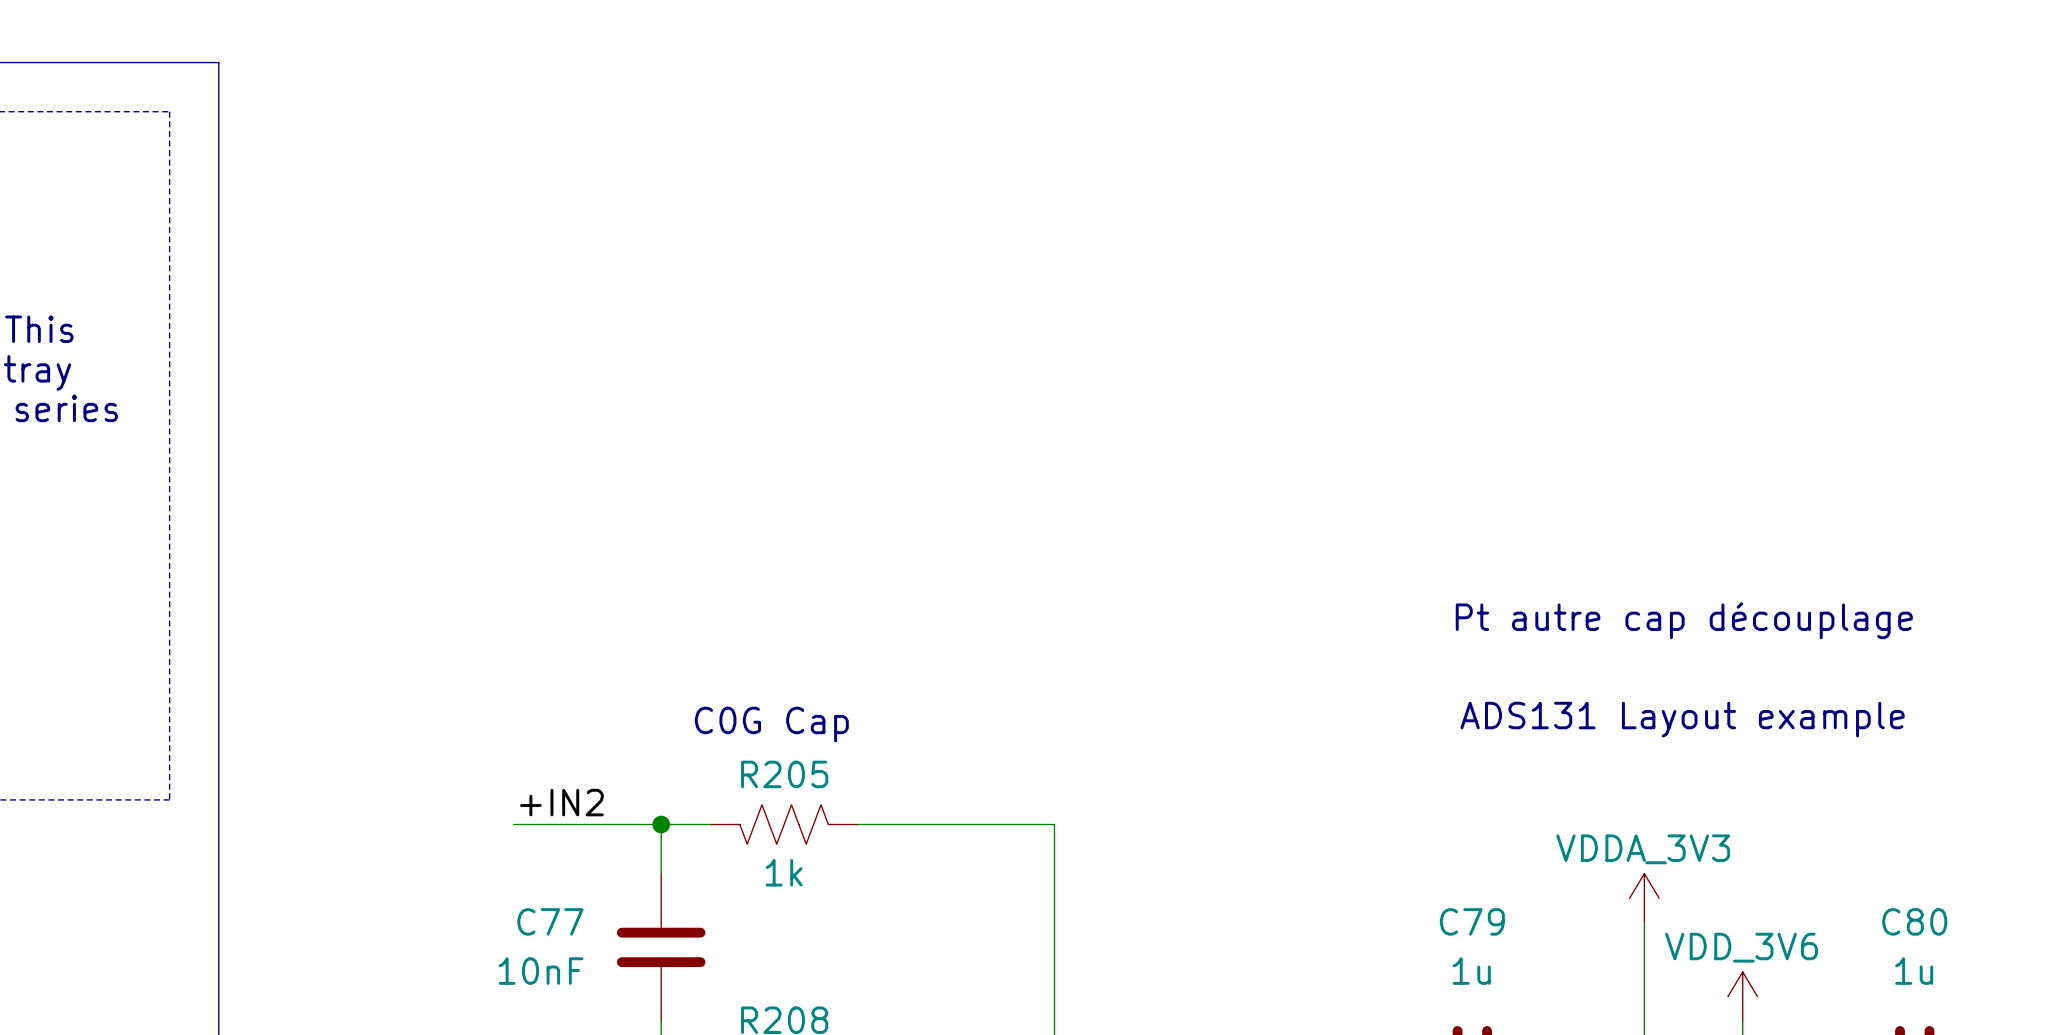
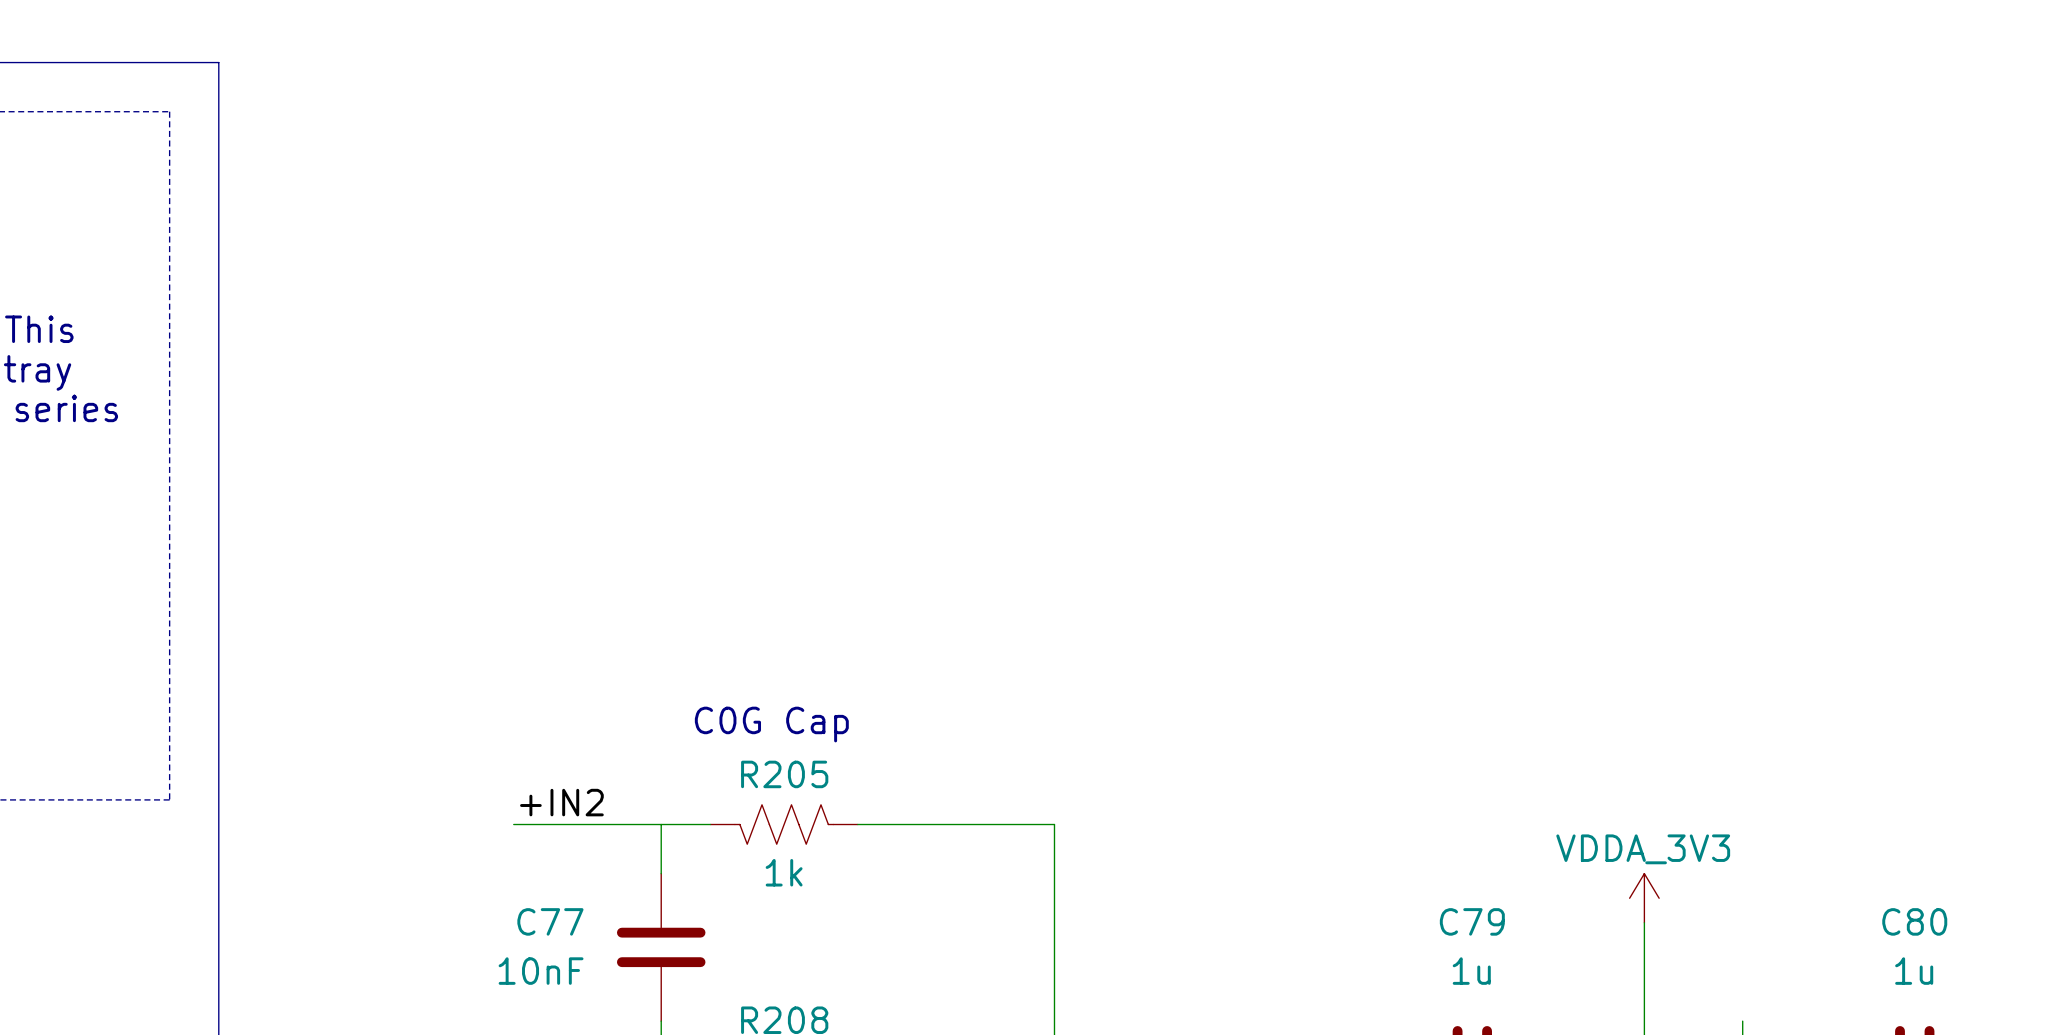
text: Pt autre cap découplage (1684, 620) -> none
text: ADS131 Layout example (1682, 719) -> none
junction: (661, 824) -> none
power symbol: VDD_3V6 (1742, 996) -> none

